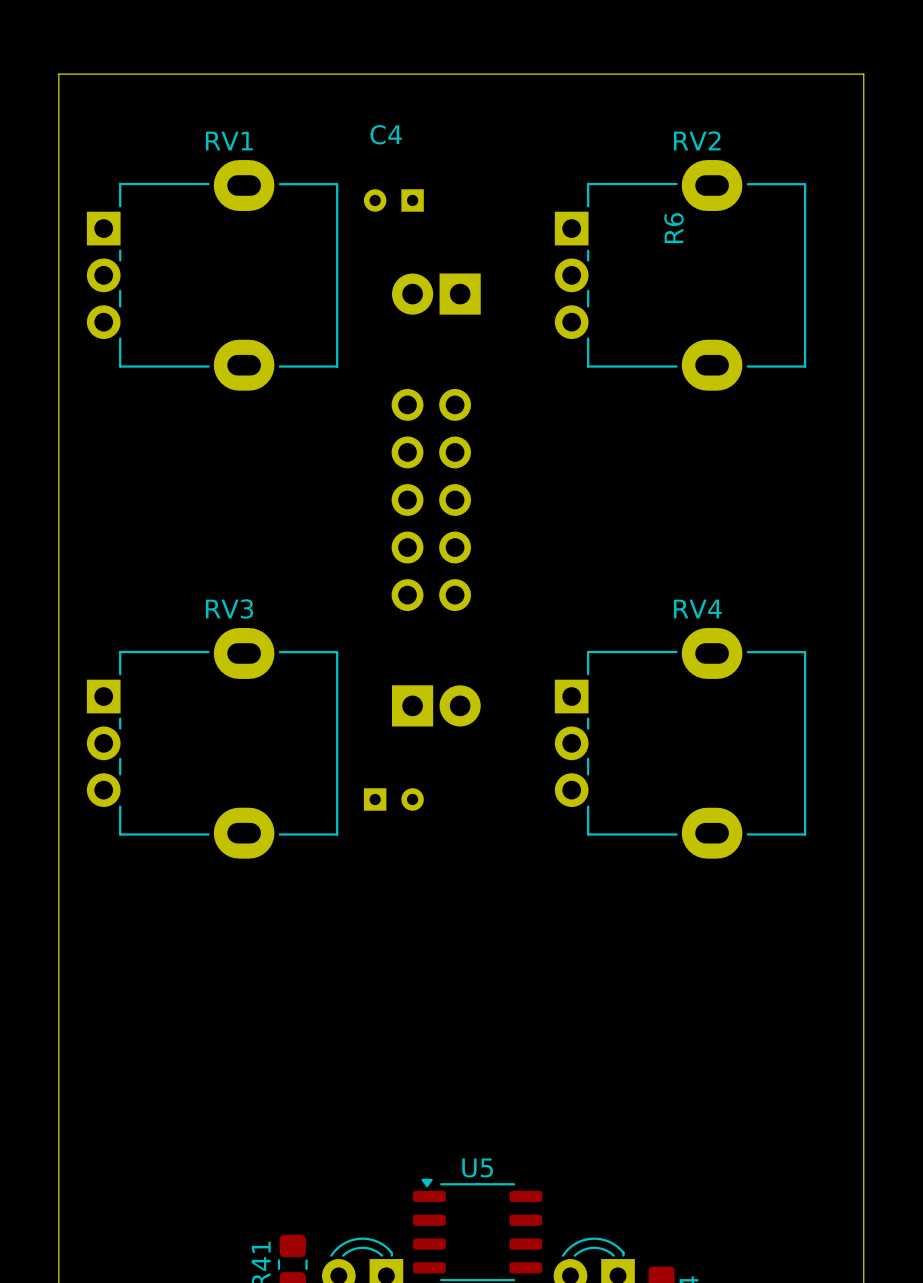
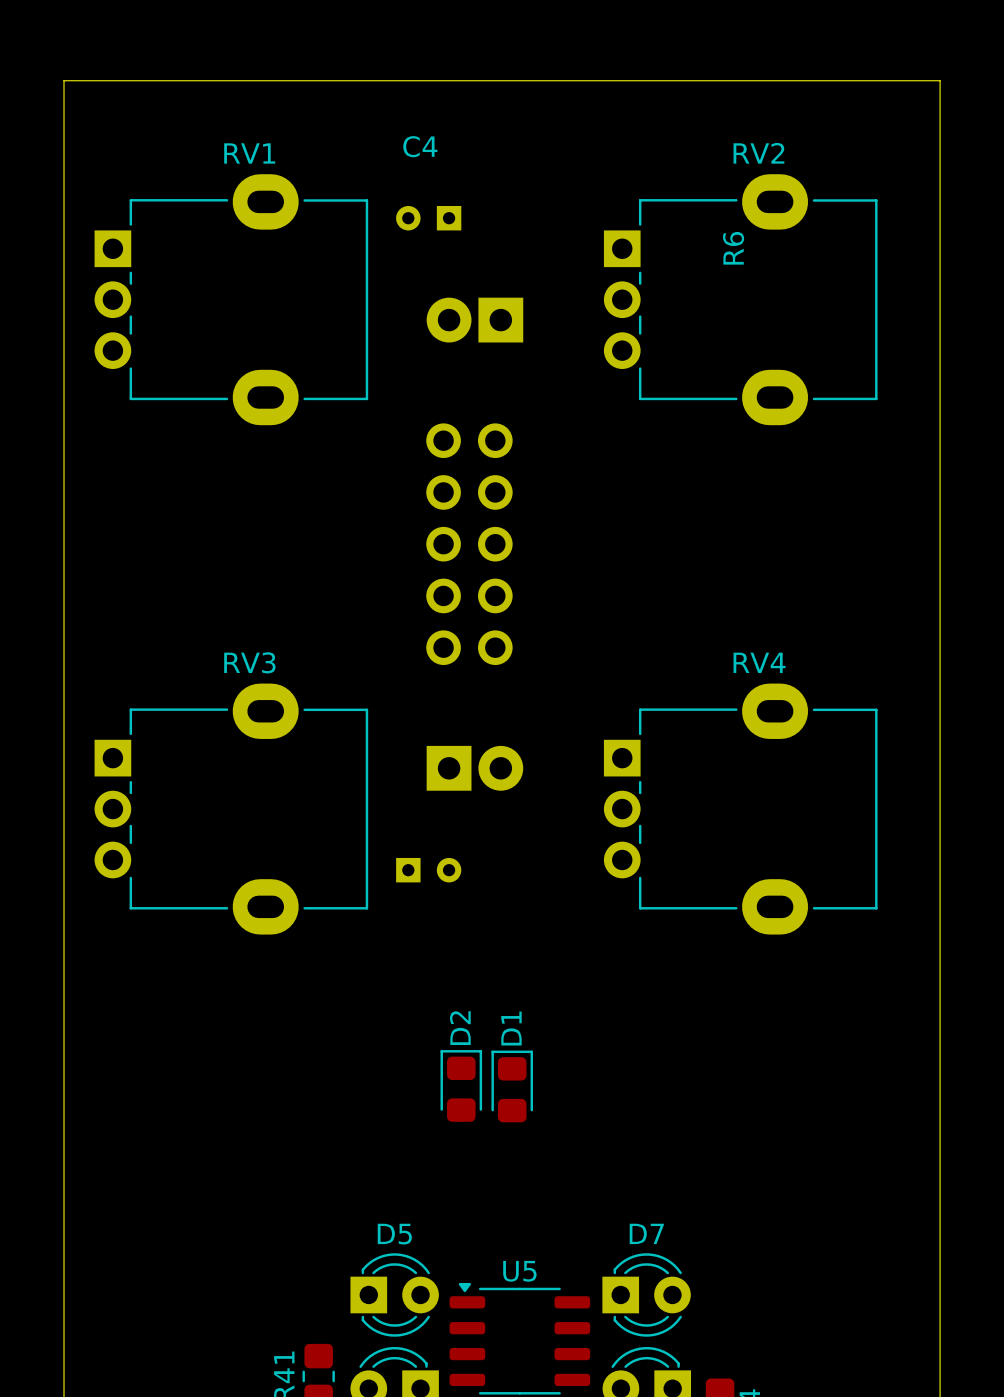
D2: none -> (461, 1085)
D1: none -> (512, 1086)
D5: none -> (394, 1294)
D7: none -> (646, 1294)

